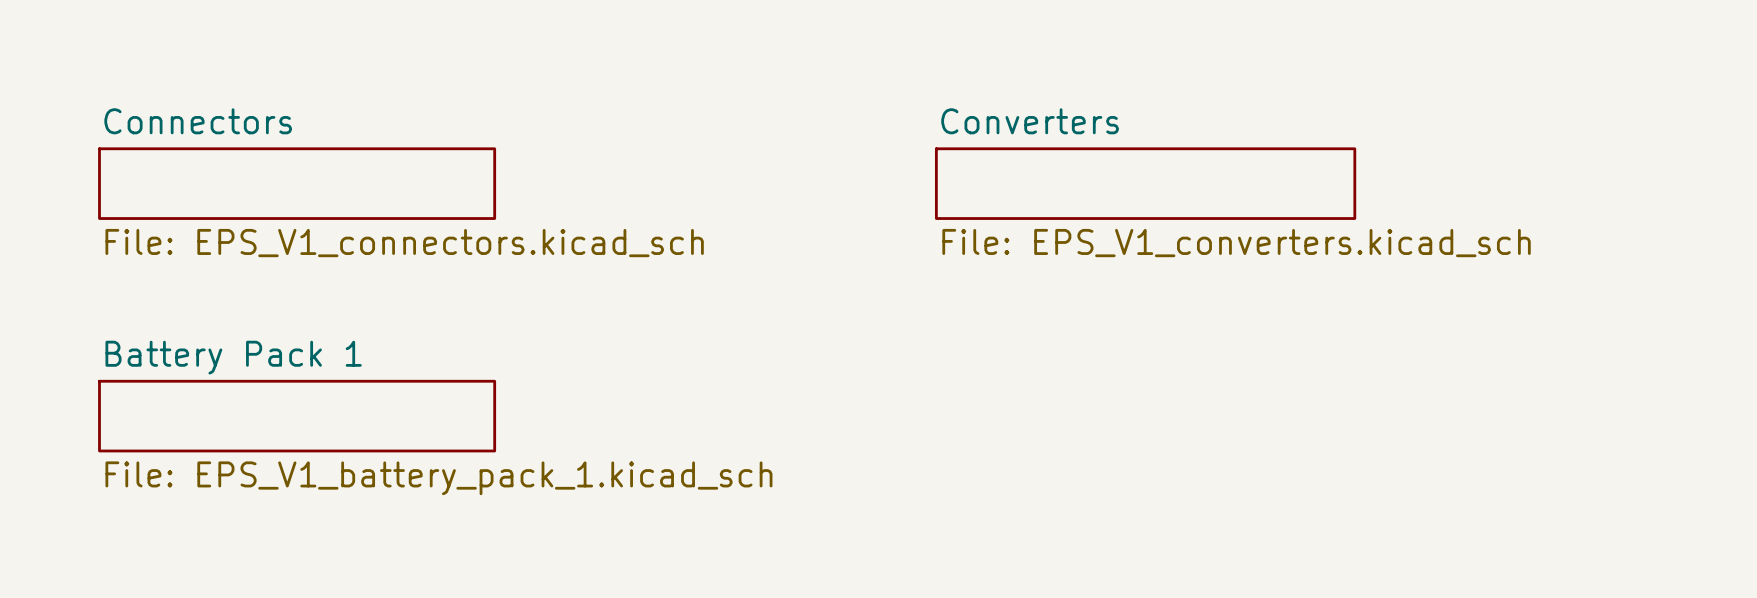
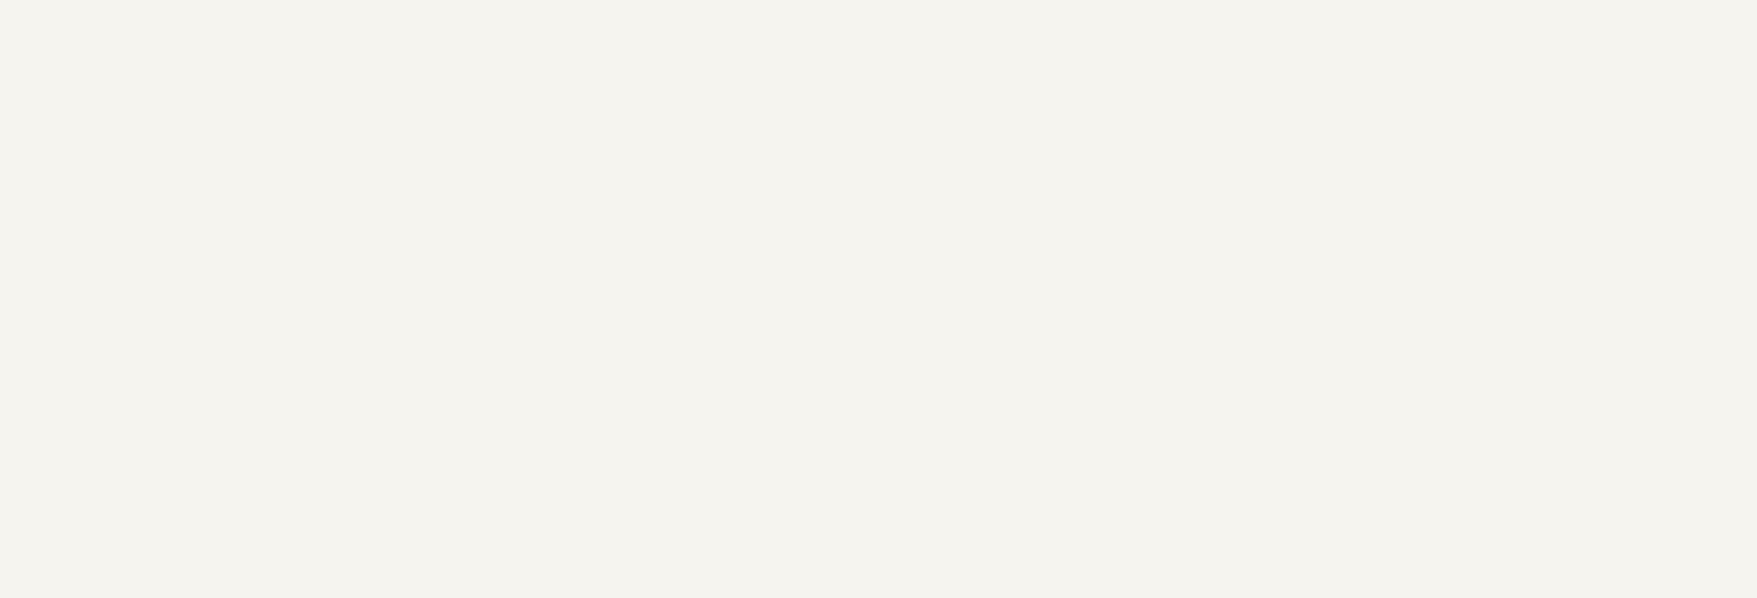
sheet Connectors: File: EPS_V1_connectors.kicad_sch (297, 183) -> none
sheet Converters: File: EPS_V1_converters.kicad_sch (1145, 183) -> none
sheet Battery Pack 1: File: EPS_V1_battery_pack_1.kicad_sch (297, 416) -> none

